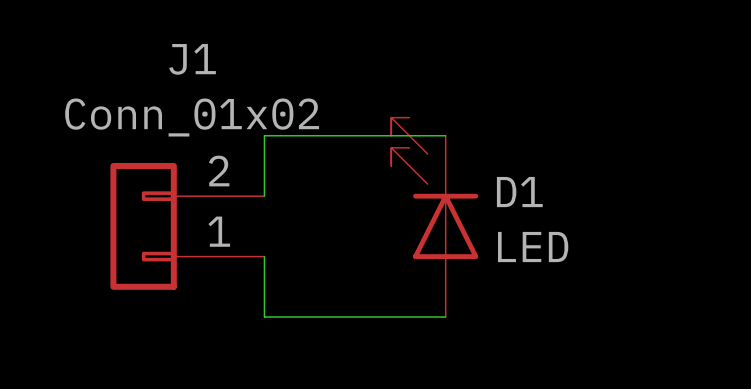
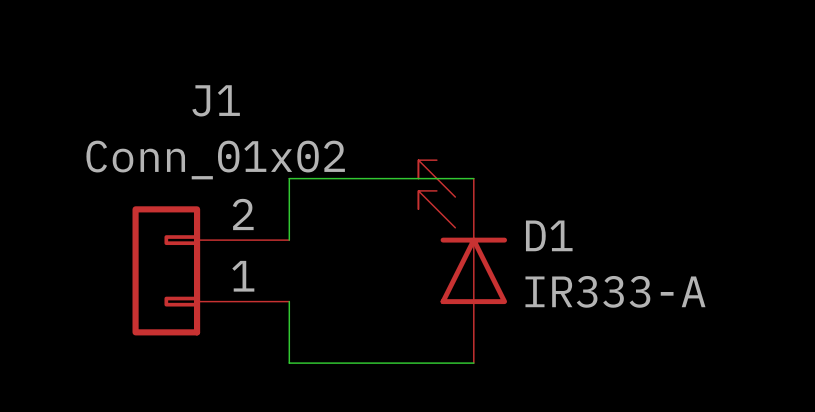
D1 value: LED (533, 247) -> IR333-A (615, 291)

